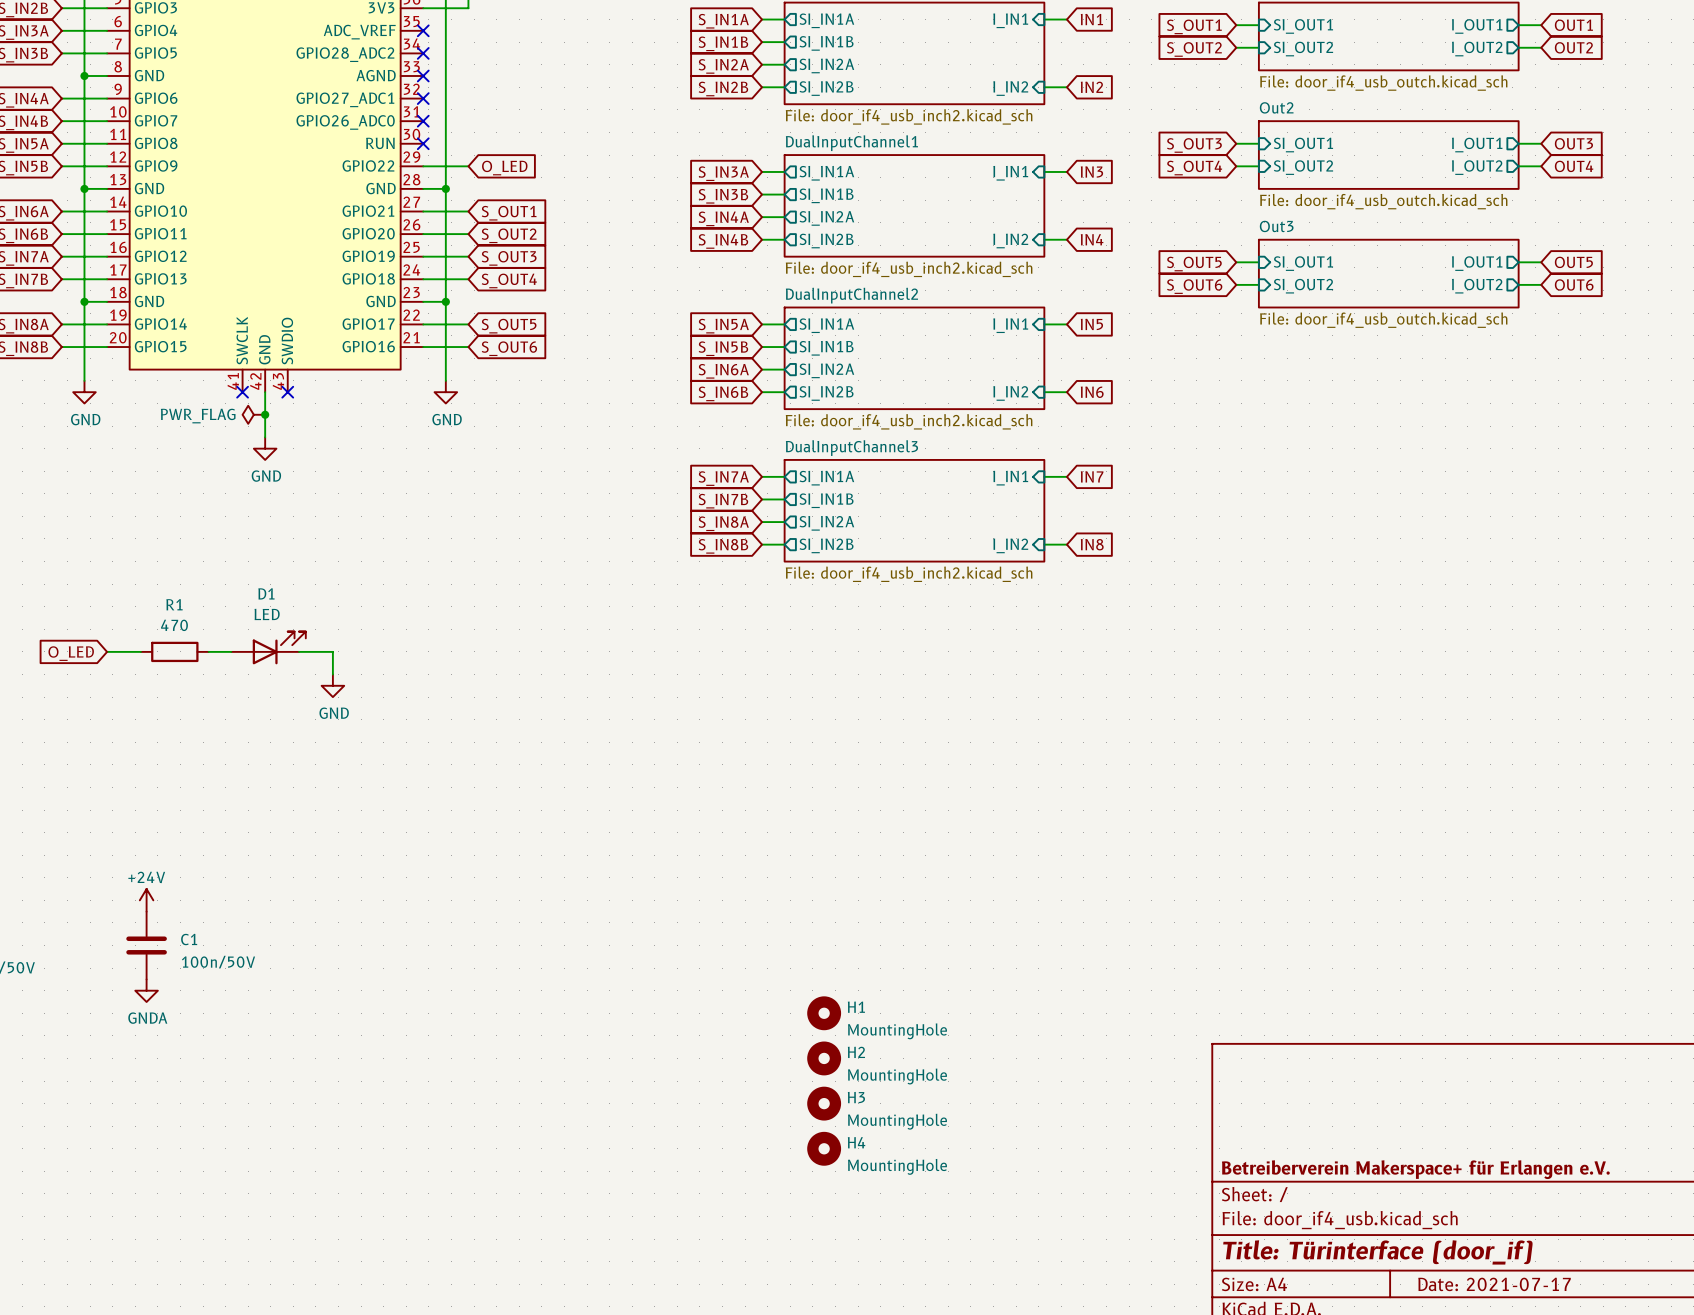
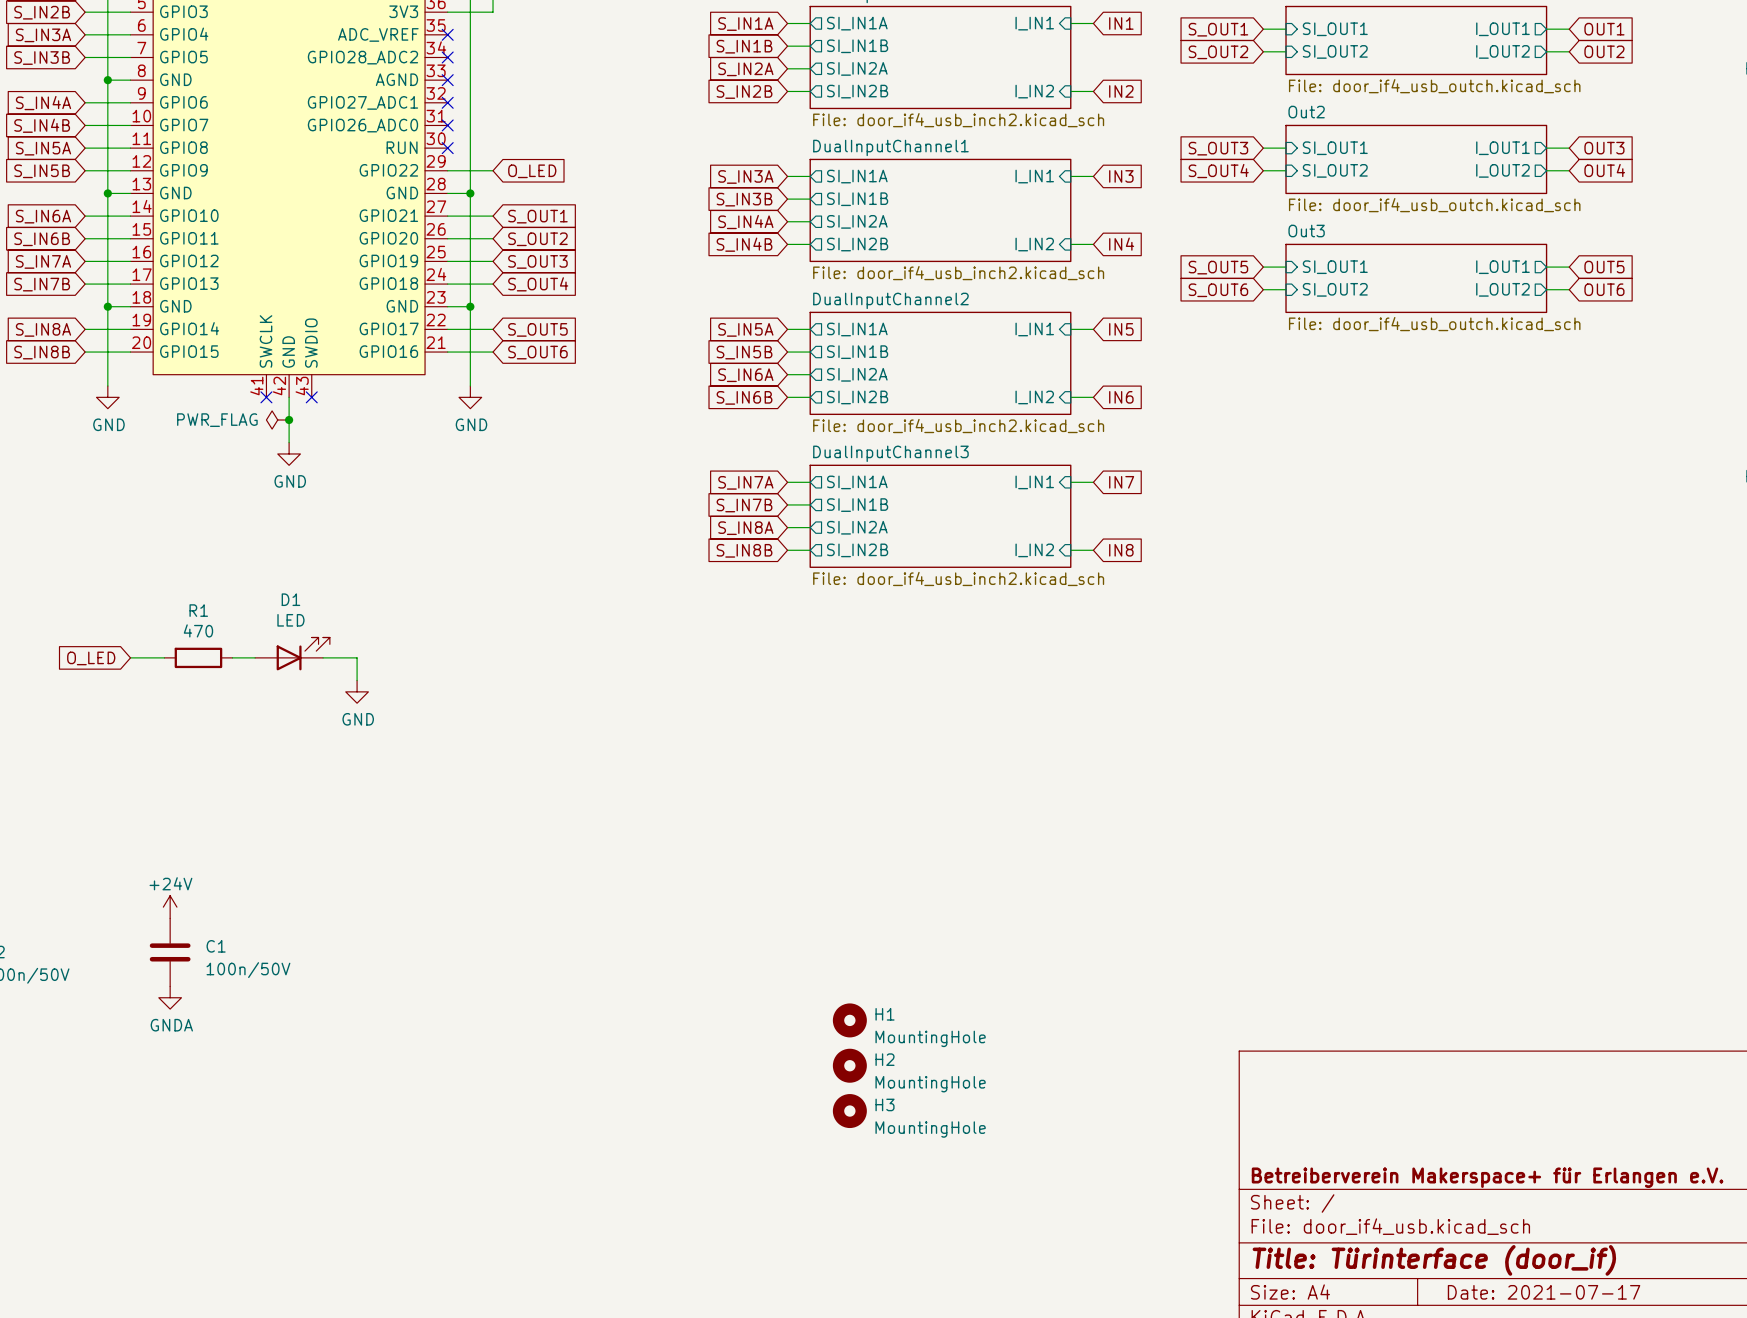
H4: MountingHole (824, 1148) -> none

